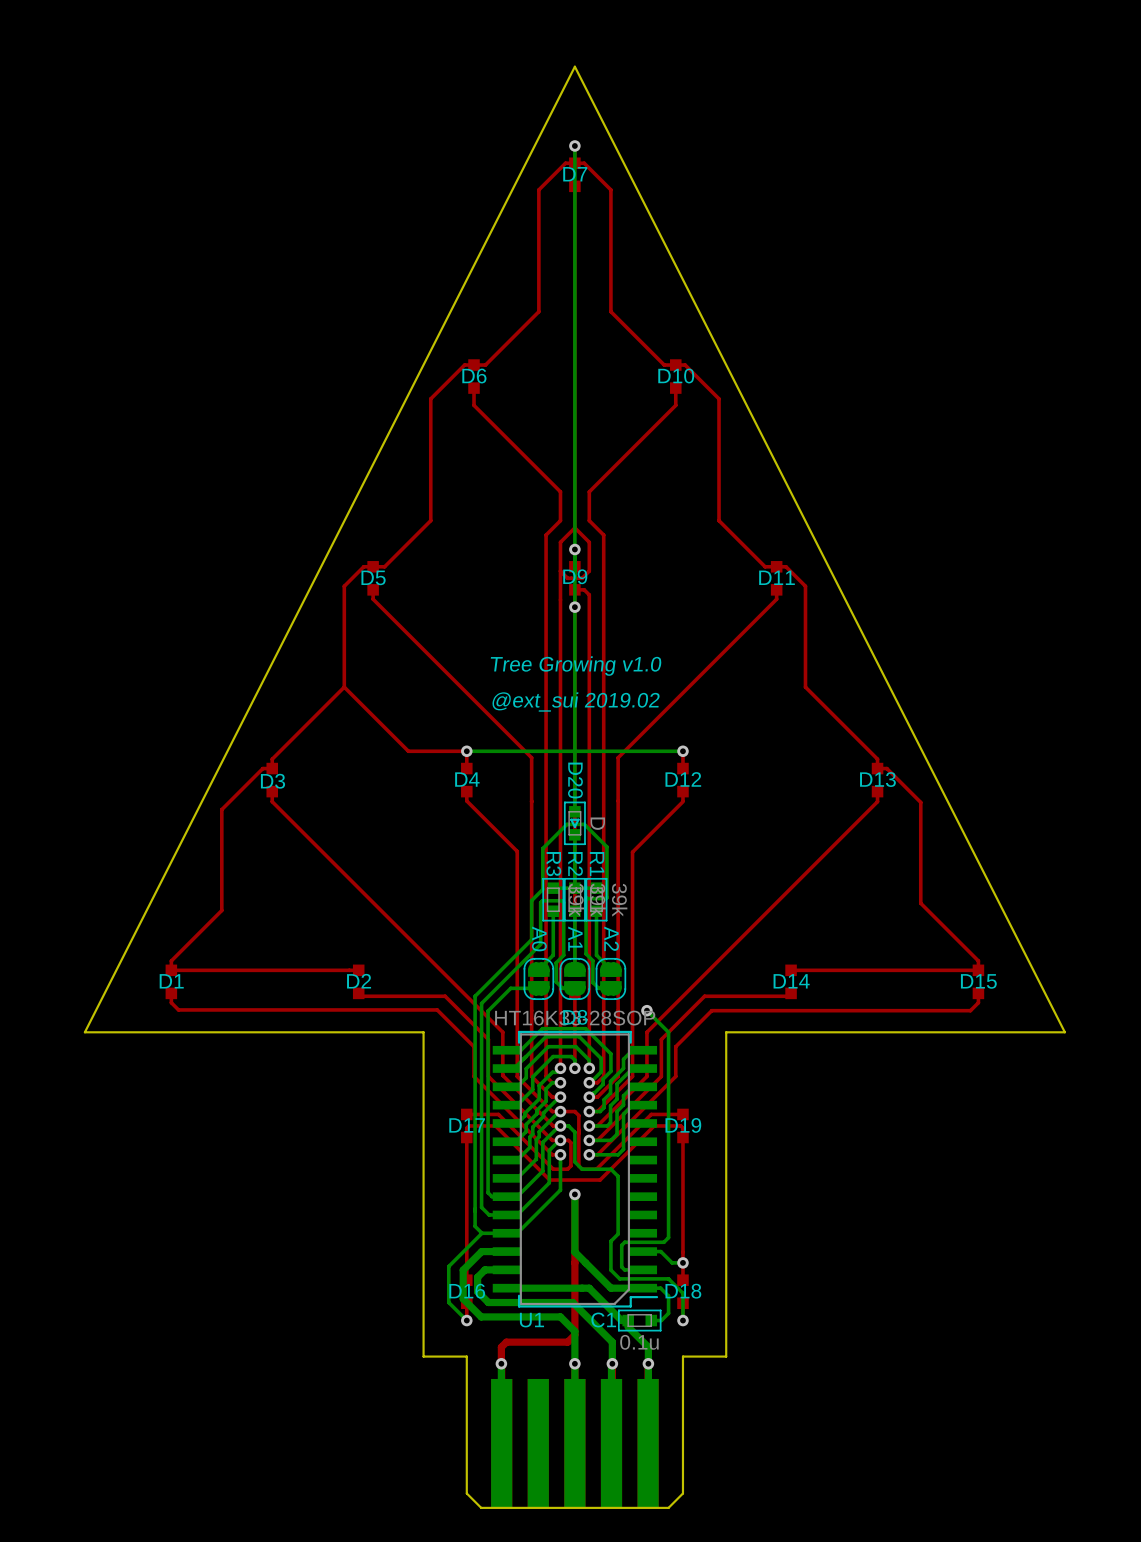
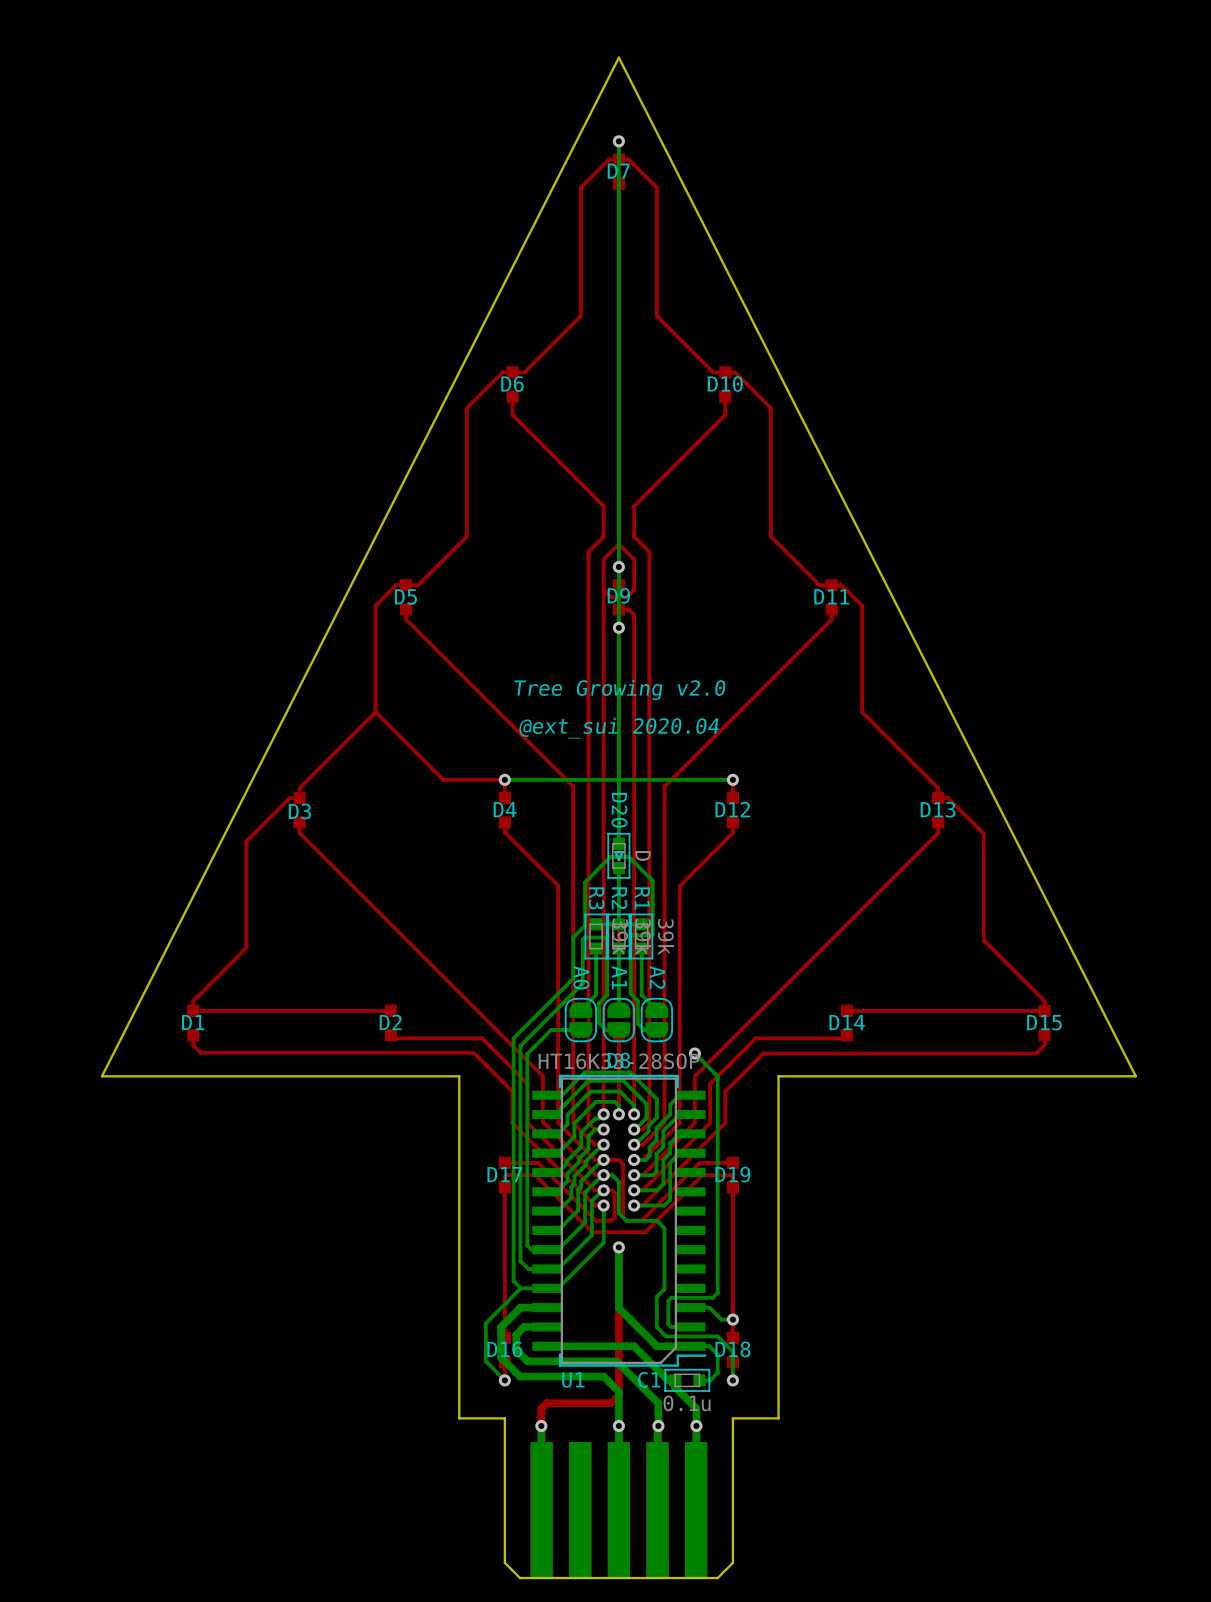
text: Tree Growing v1.0 (576, 666) -> Tree Growing v2.0 (620, 689)
text: @ext_sui 2019.02 (576, 701) -> @ext_sui 2020.04 (618, 728)

